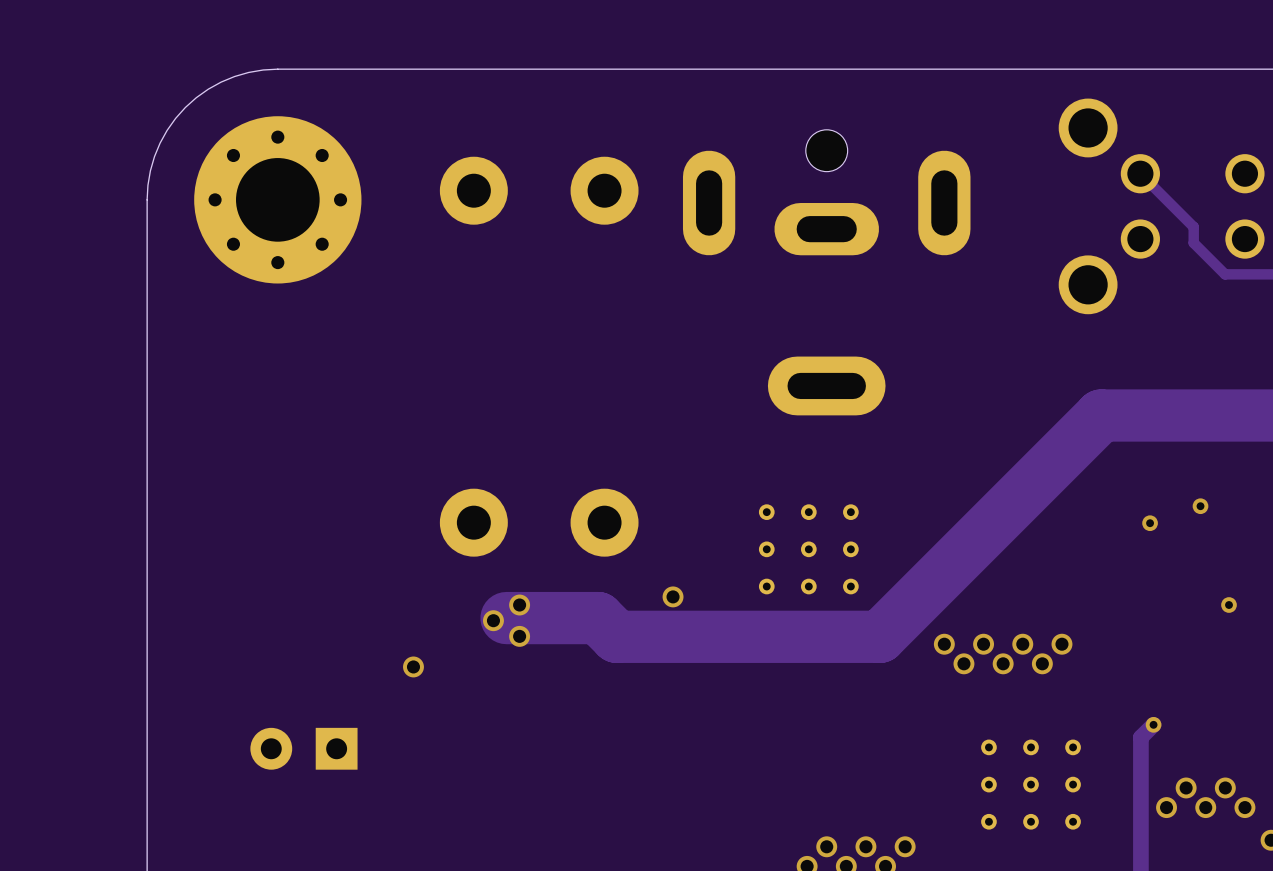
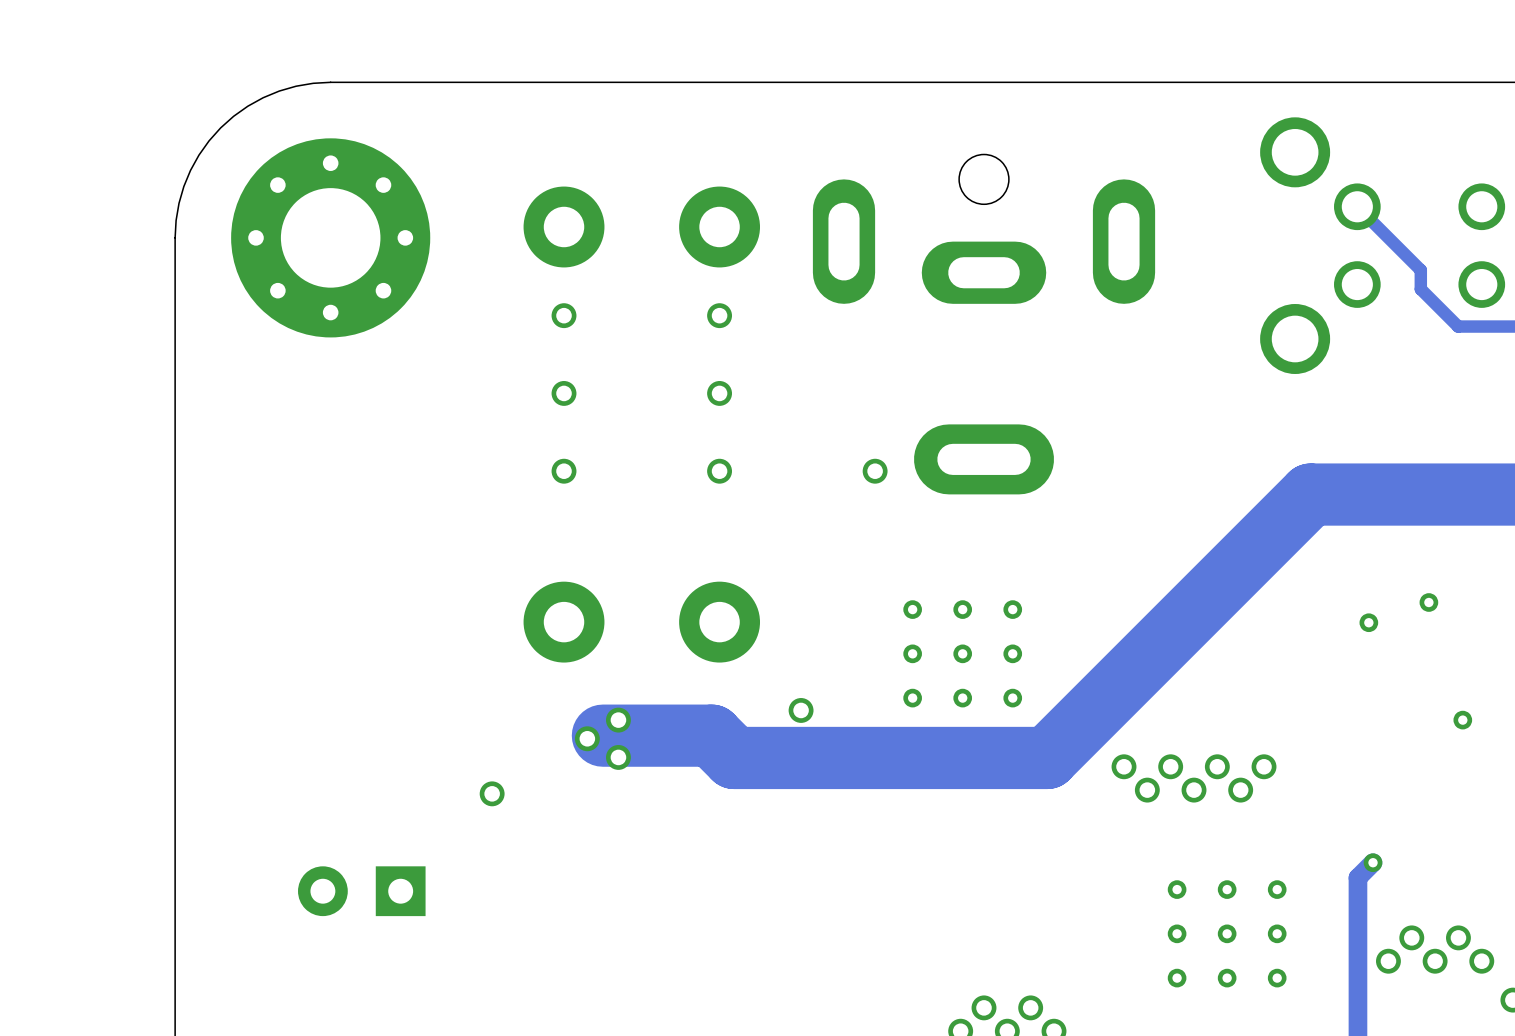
via: none -> (564, 315)
via: none -> (719, 315)
via: none -> (564, 393)
via: none -> (719, 393)
via: none -> (564, 471)
via: none -> (719, 471)
via: none -> (875, 471)
via: (905, 846) -> none

